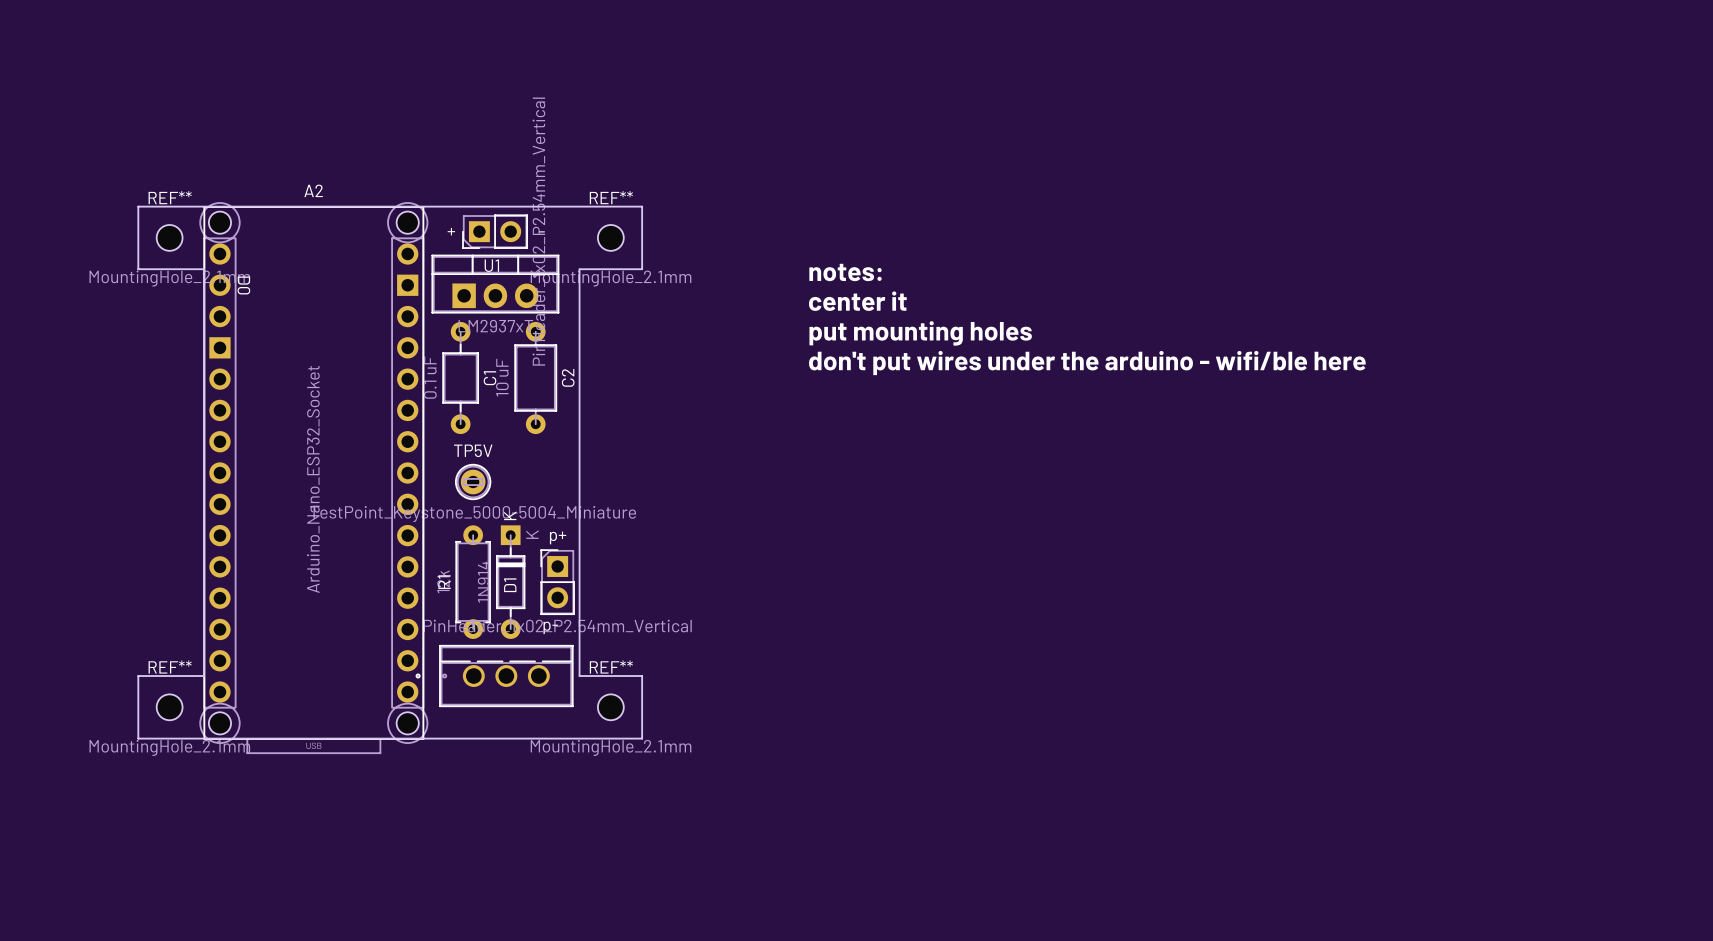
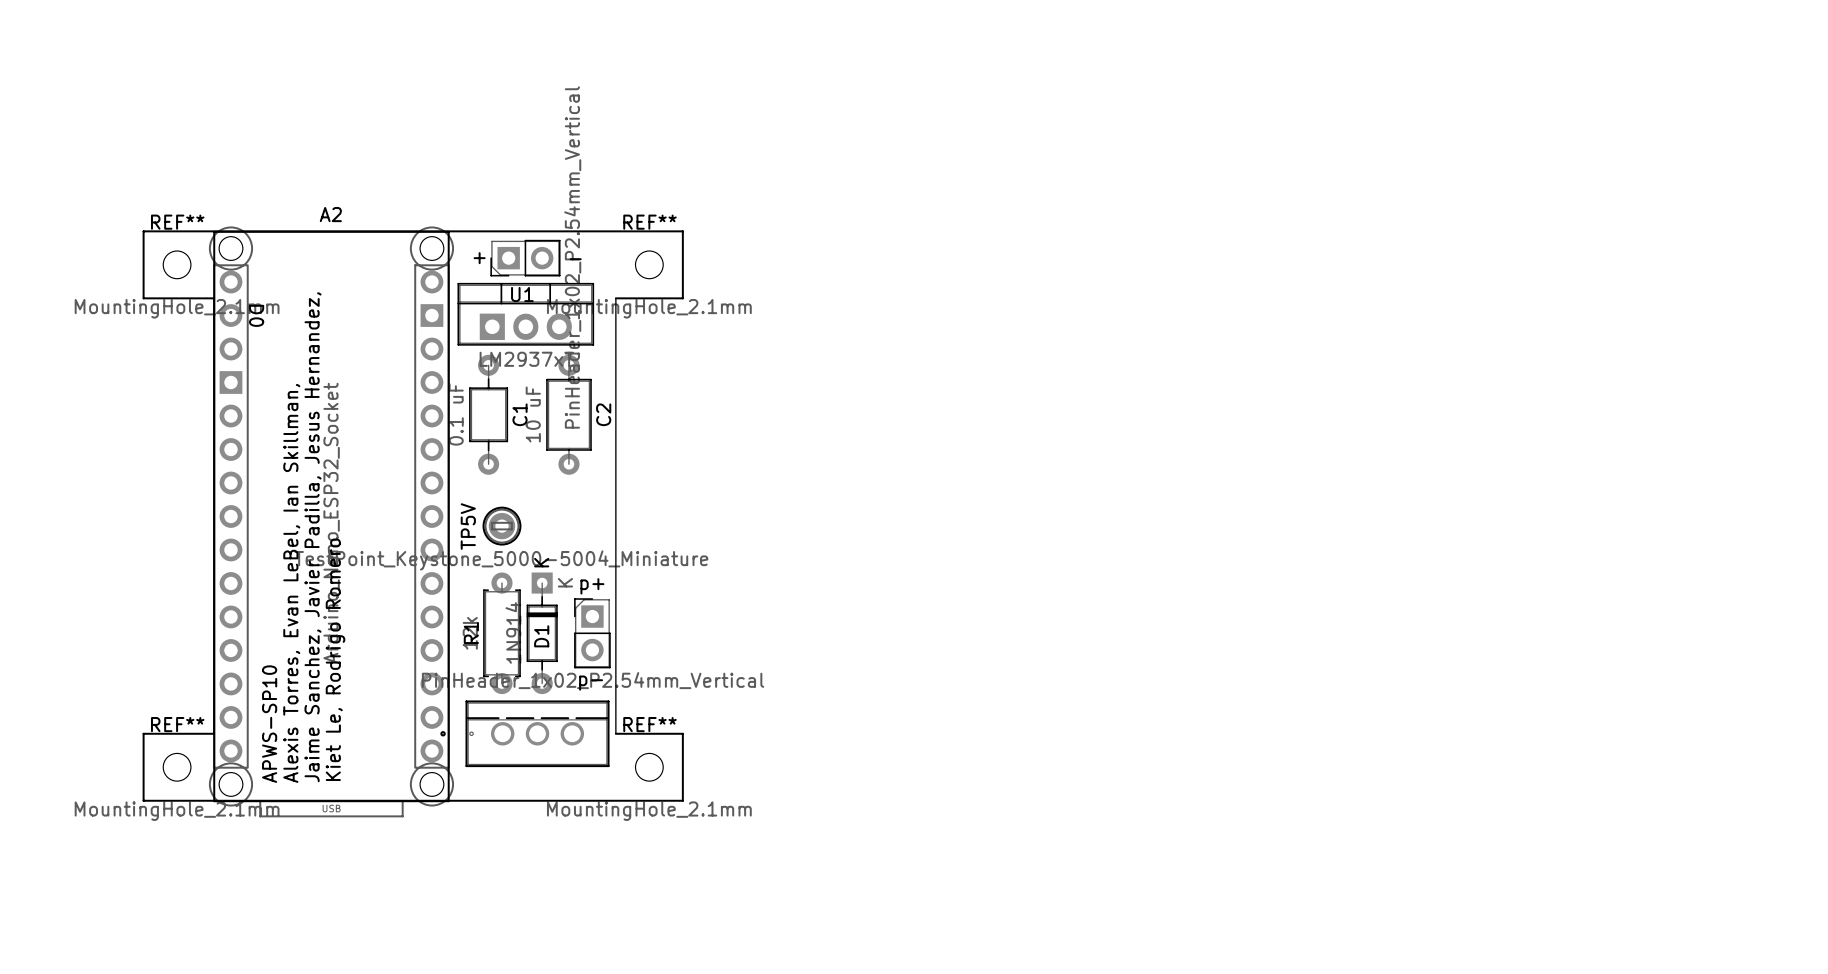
text: notes: (845, 272) -> none
text: center it (857, 301) -> none
text: put mounting holes (920, 333) -> none
text: don't put wires under the arduino - wifi/ble here (1087, 363) -> none
TP5V name rotation: 0° (473, 450) -> 90° counterclockwise (468, 526)
text: none -> Jaime Sanchez, Javier Padilla, Jesus Hernandez, (313, 537)
text: none -> Alexis Torres, Evan LeBel, Ian Skillman, (291, 583)
text: none -> Kiet Le, Rodrigo Romero (335, 659)
text: none -> APWS-SP10 (269, 724)

